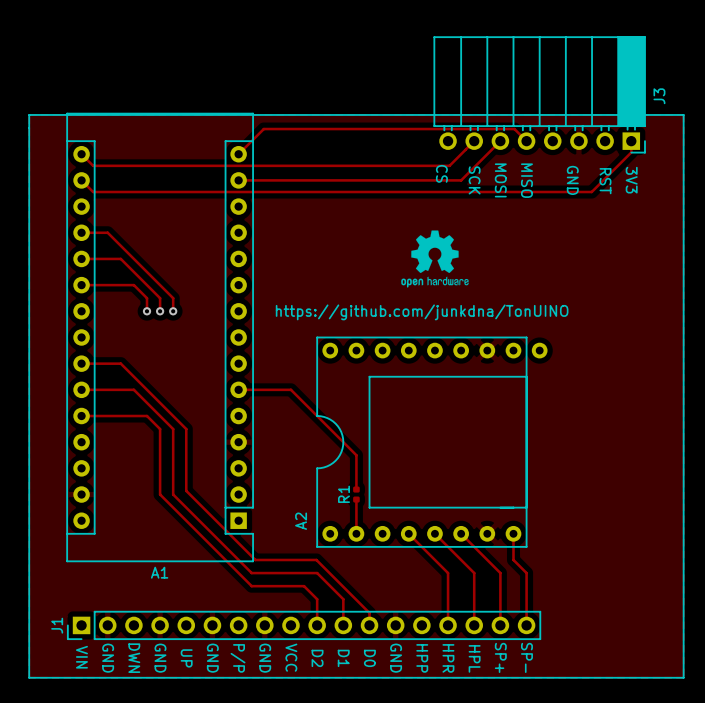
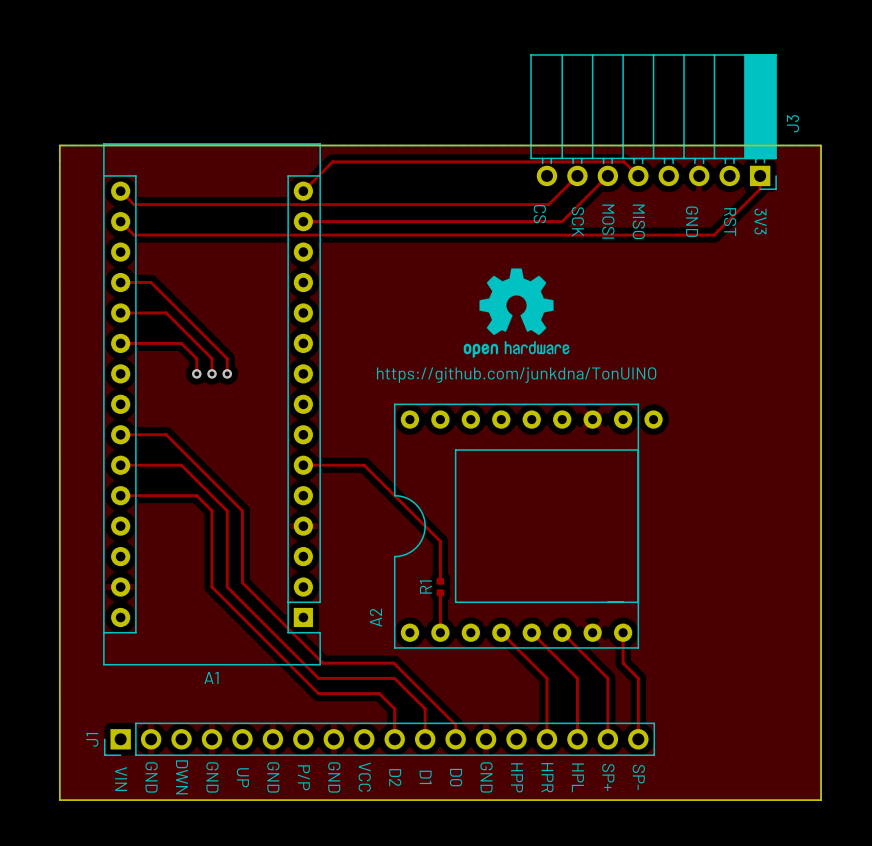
board edge: none -> (59, 145) (59, 800) (821, 800) (821, 145) (59, 145)
drawing: none -> [463, 268, 570, 358]
drawing: [401, 230, 469, 288] -> none

